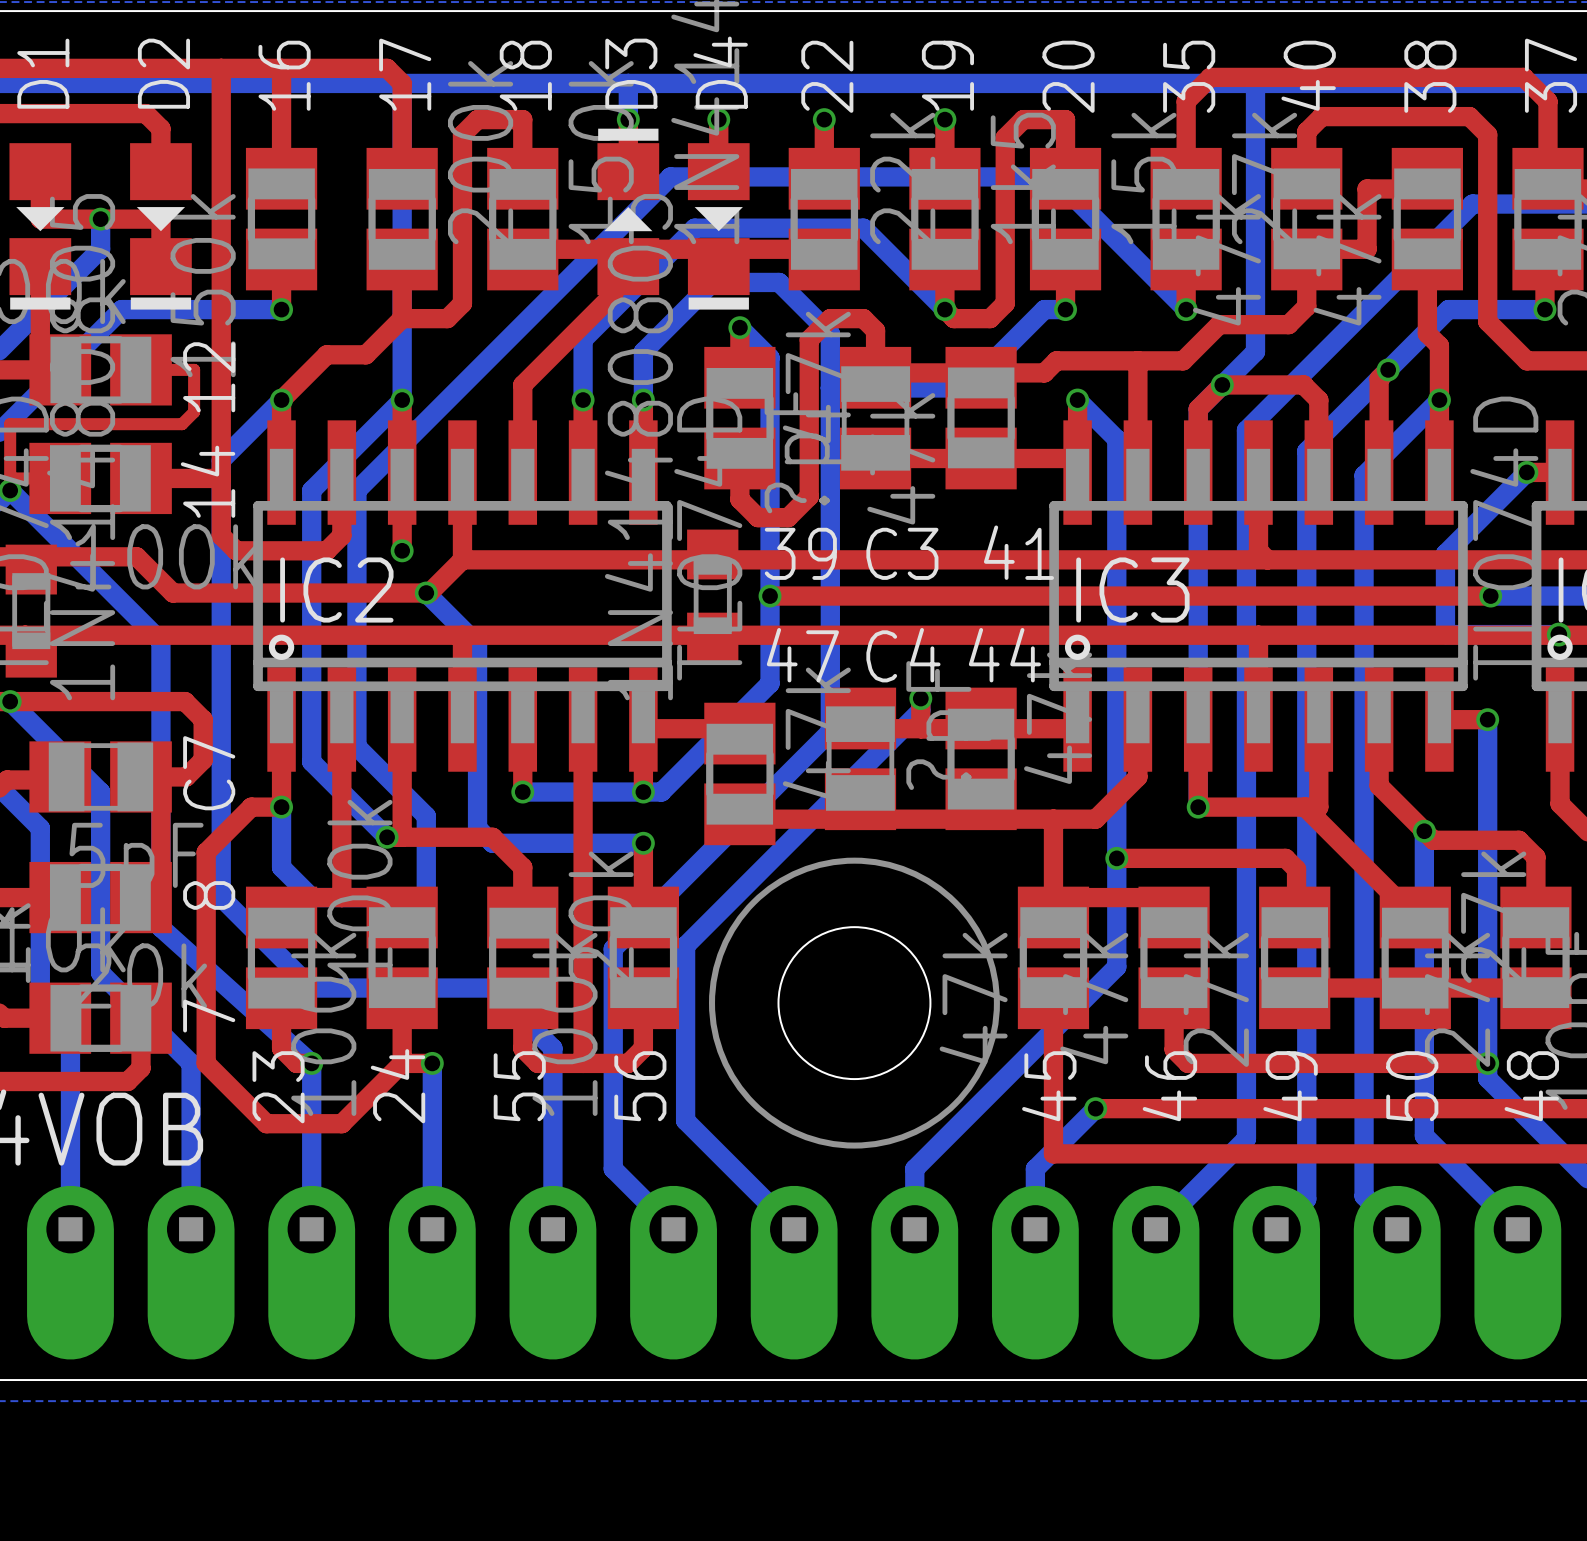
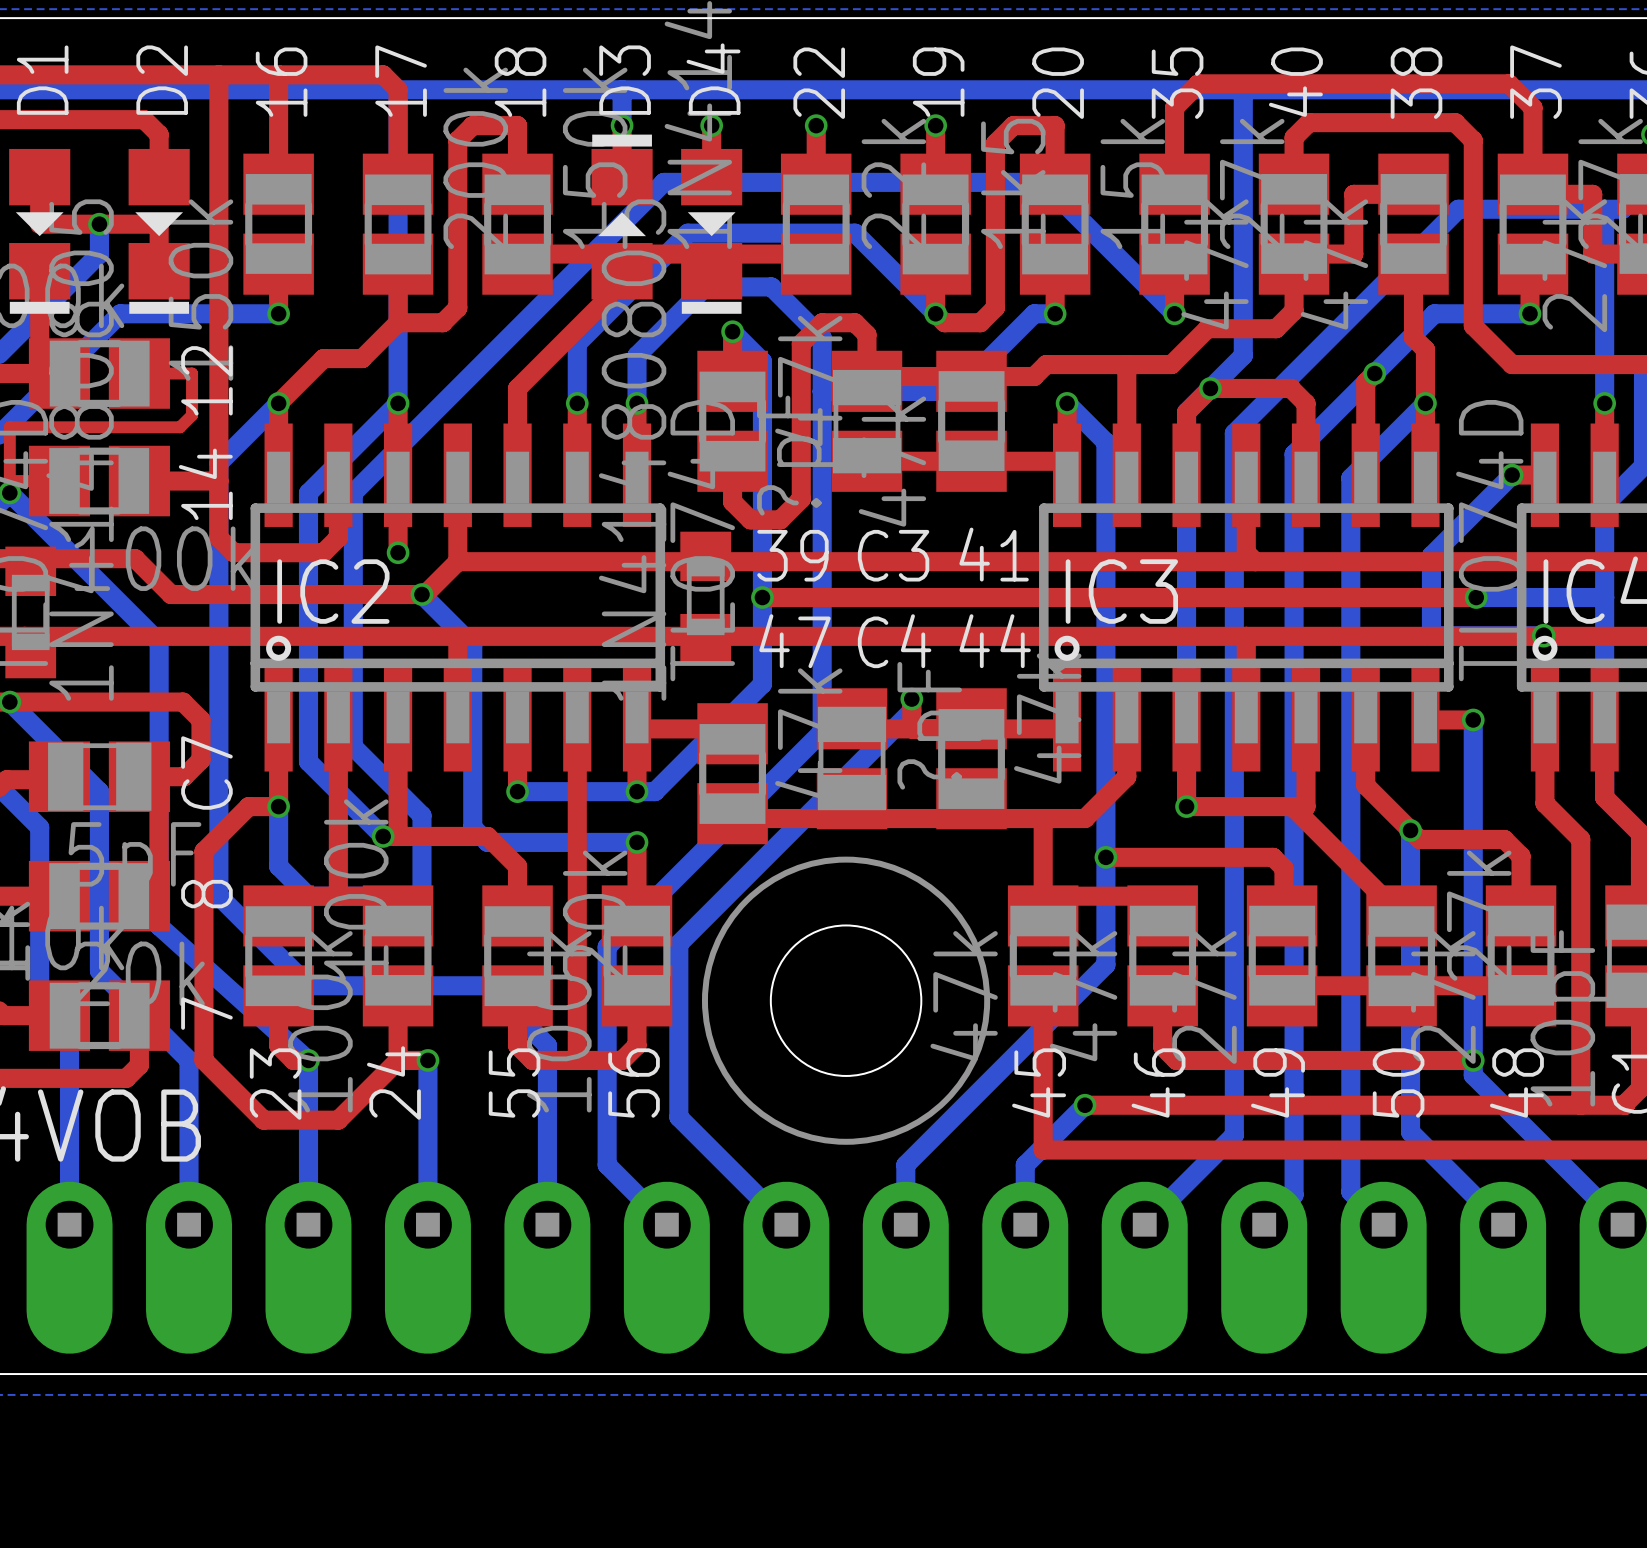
text position: 41 (1018, 552) -> 41 (994, 554)
text position: 47 (802, 655) -> 47 (795, 641)
text position: C4 (903, 655) -> C4 (894, 641)
text position: 44 (1004, 655) -> 44 (995, 641)

